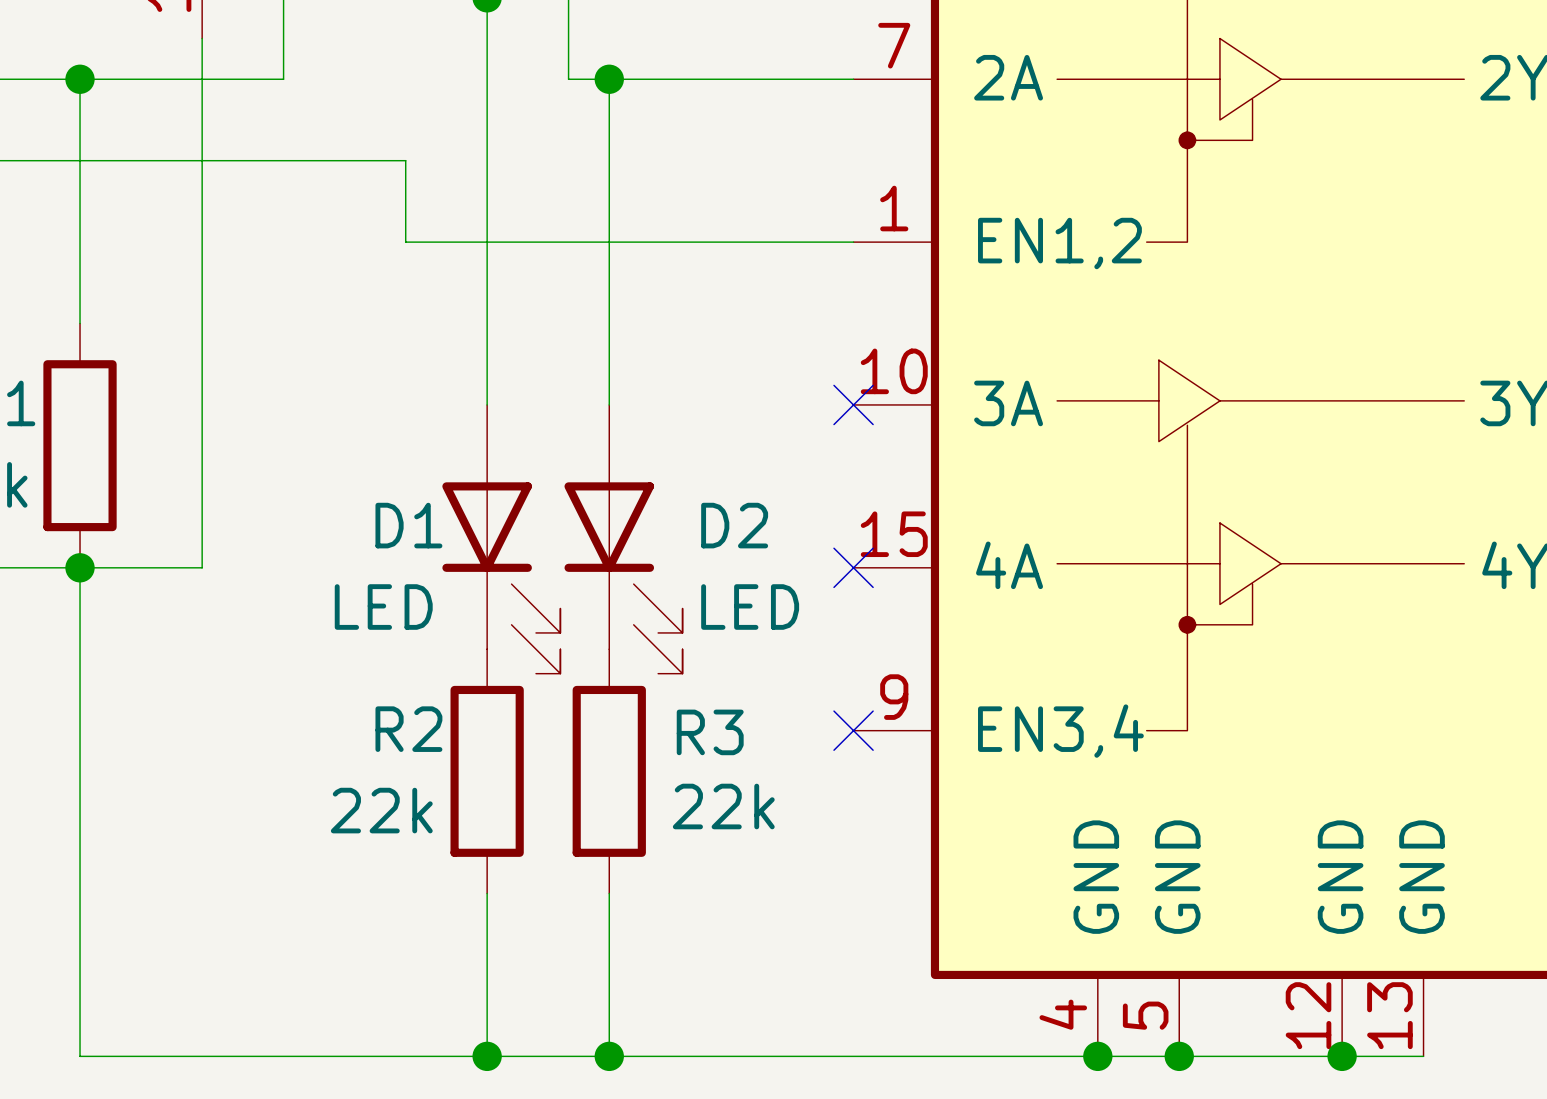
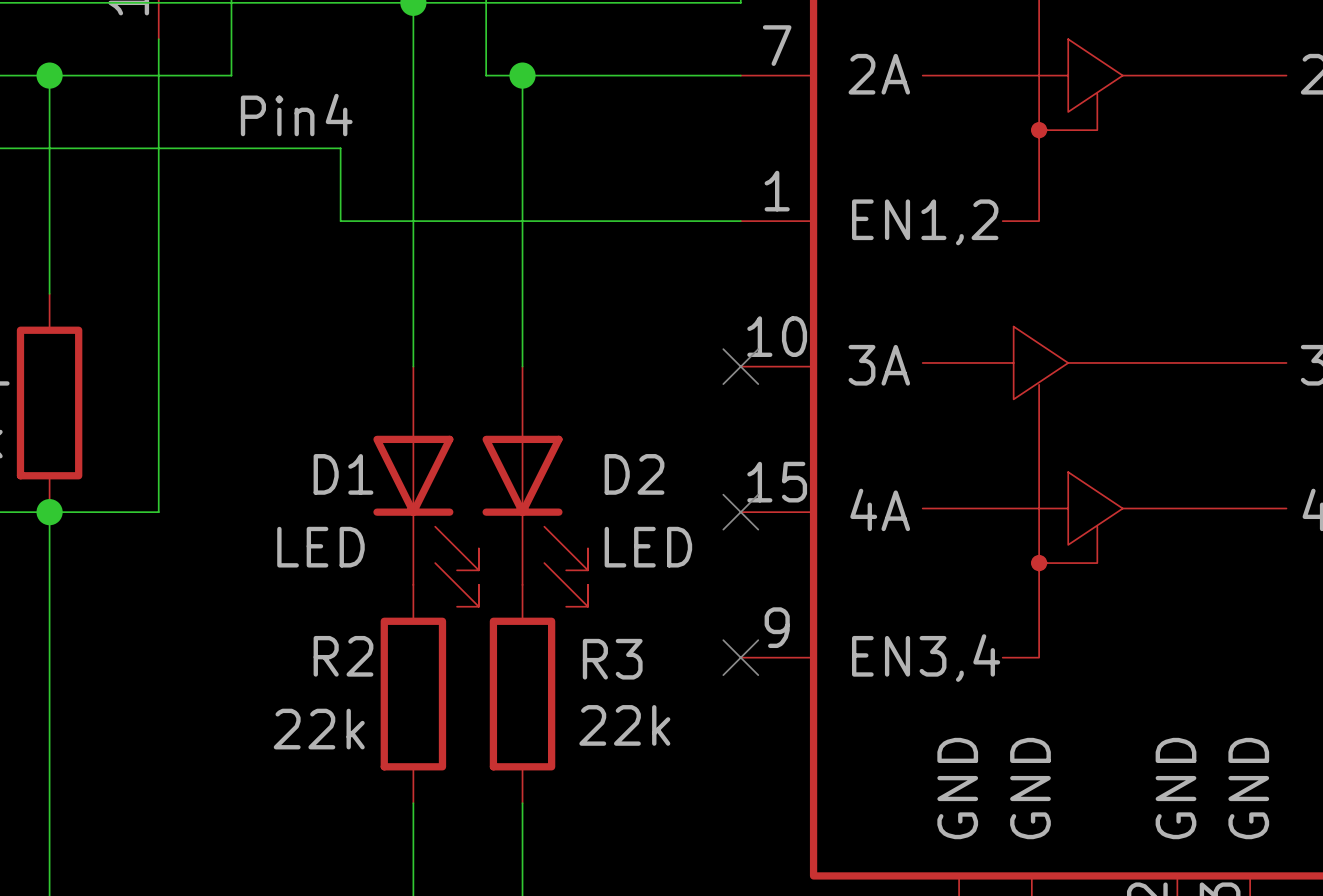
label: none -> Pin4 (296, 115)

